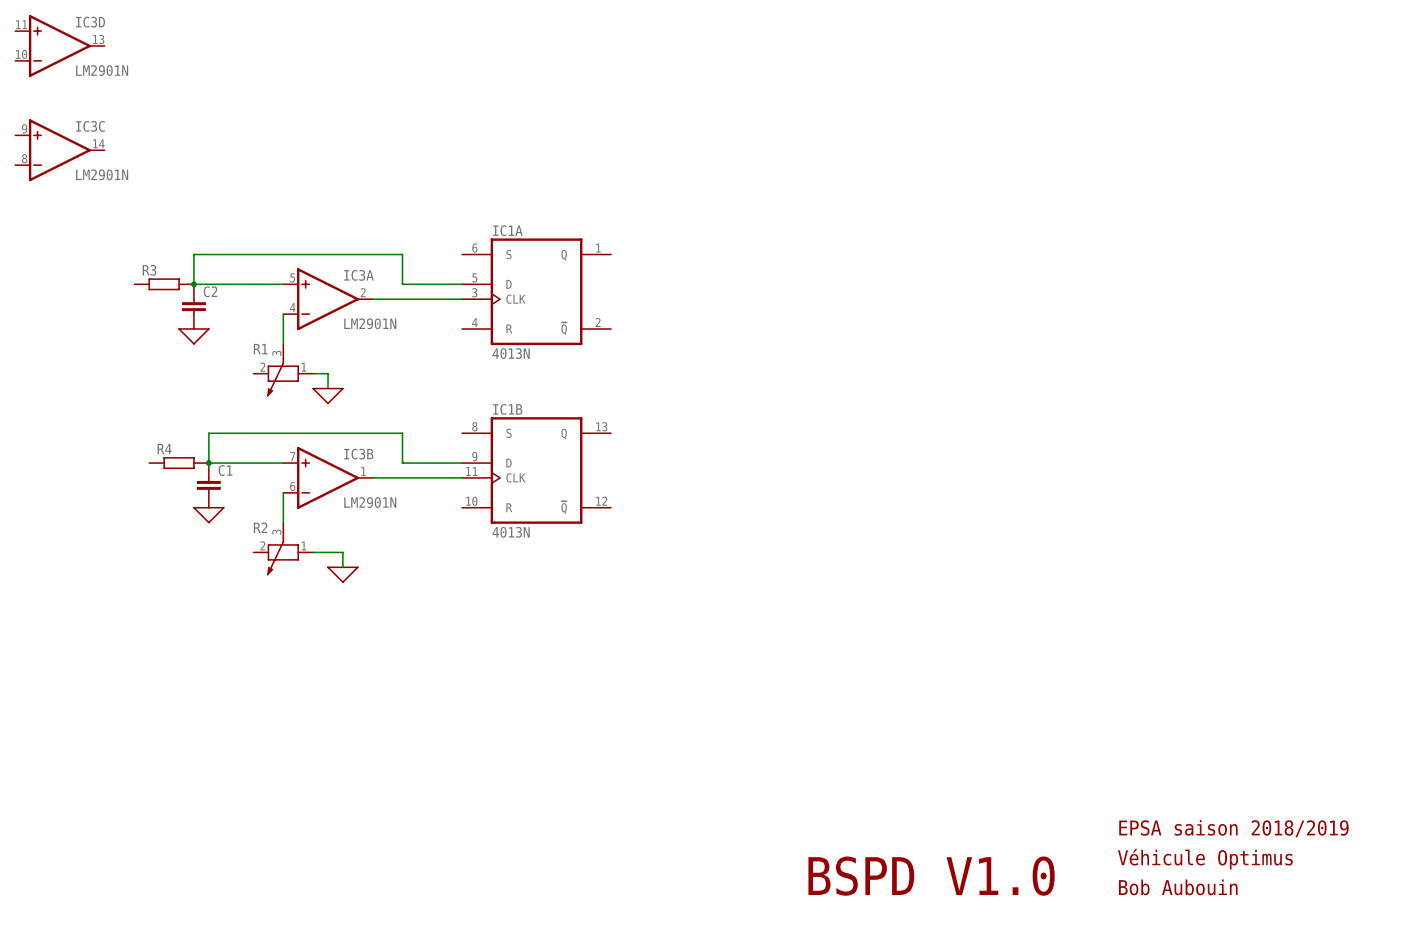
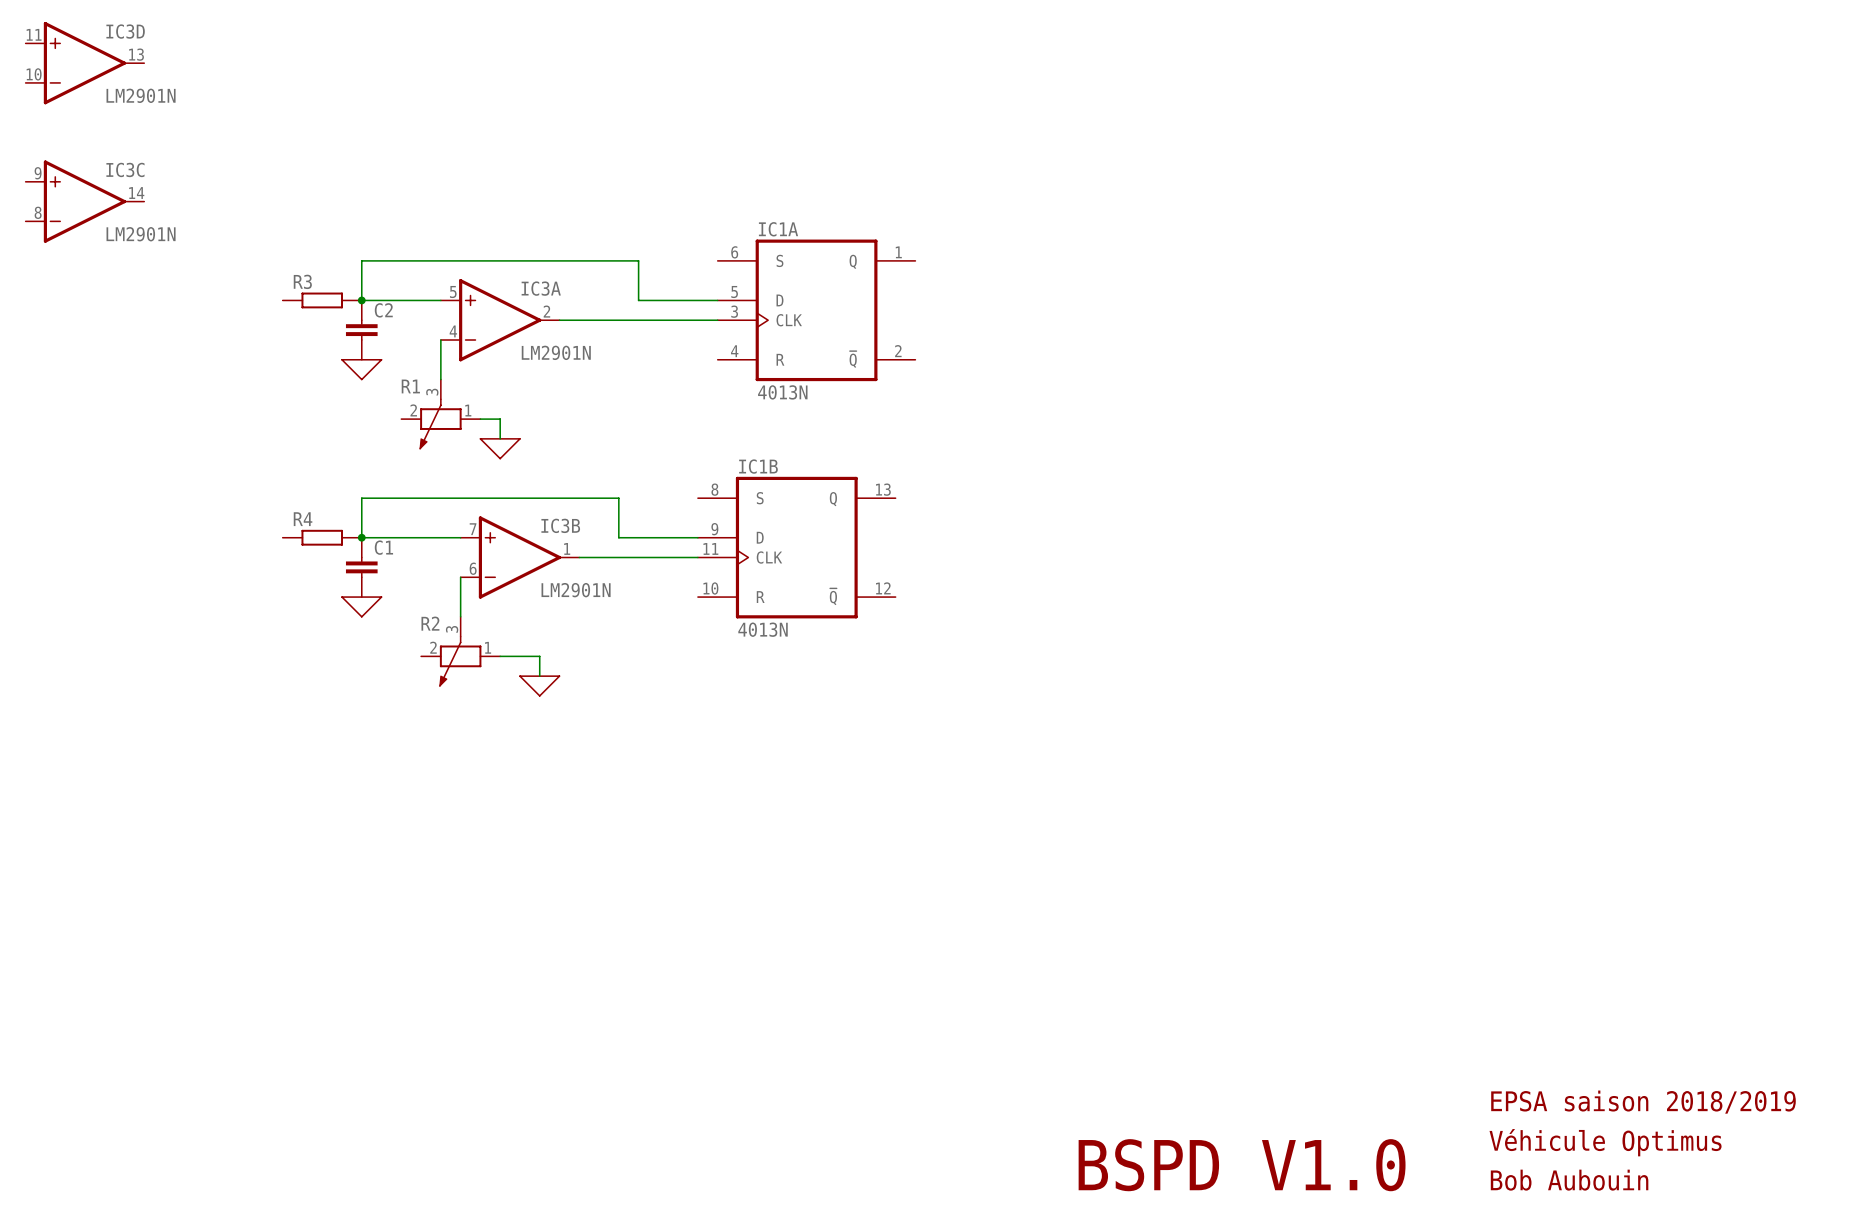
junction: none -> (361, 300)
wire: none -> (440, 300) (361, 300) (361, 260) (638, 260) (638, 300) (717, 300)
wire: none -> (559, 320) (717, 320)
power symbol: none -> (361, 369)
R3 position: (164, 284) -> (322, 300)
junction: (193, 284) -> none
wire: (283, 284) (193, 284) (193, 254) (402, 254) (402, 284) (462, 284) -> none
IC1A position: (536, 291) -> (816, 310)
IC3A position: (328, 299) -> (500, 320)
wire: (372, 299) (462, 299) -> none
C2 position: (193, 306) -> (361, 330)
wire: (283, 314) (283, 343) -> (440, 340) (440, 379)
wire: none -> (480, 419) (500, 419) (500, 438)
power symbol: (193, 336) -> none
power symbol: none -> (500, 448)
R1 position: (283, 370) -> (440, 414)
wire: none -> (421, 498) (361, 498) (361, 537) (460, 537)
wire: (328, 373) (328, 388) -> (440, 498) (618, 498) (618, 537) (697, 537)
power symbol: (328, 396) -> none
junction: none -> (361, 537)
power symbol: none -> (361, 606)
R4 position: (179, 463) -> (322, 537)
junction: (208, 463) -> none
wire: (283, 463) (208, 463) (208, 433) (402, 433) (402, 463) (462, 463) -> none
IC1B position: (536, 470) -> (796, 547)
IC3B position: (328, 477) -> (519, 557)
wire: (372, 477) (462, 477) -> (579, 557) (697, 557)
C1 position: (208, 485) -> (361, 567)
wire: (283, 492) (283, 522) -> (460, 577) (460, 616)
power symbol: (208, 515) -> none
power symbol: none -> (539, 686)
R2 position: (283, 548) -> (460, 651)
wire: (313, 552) (342, 552) (342, 567) -> (500, 656) (539, 656) (539, 676)
power symbol: (342, 574) -> none

